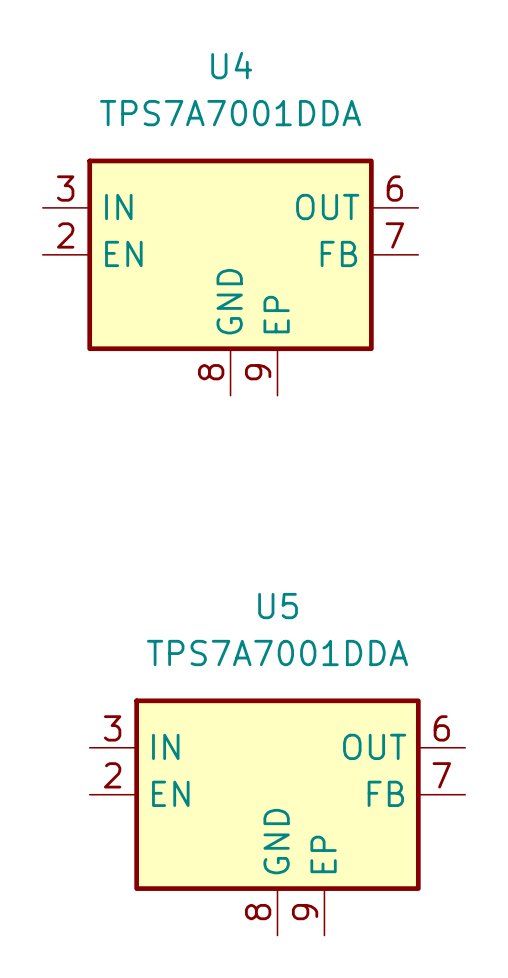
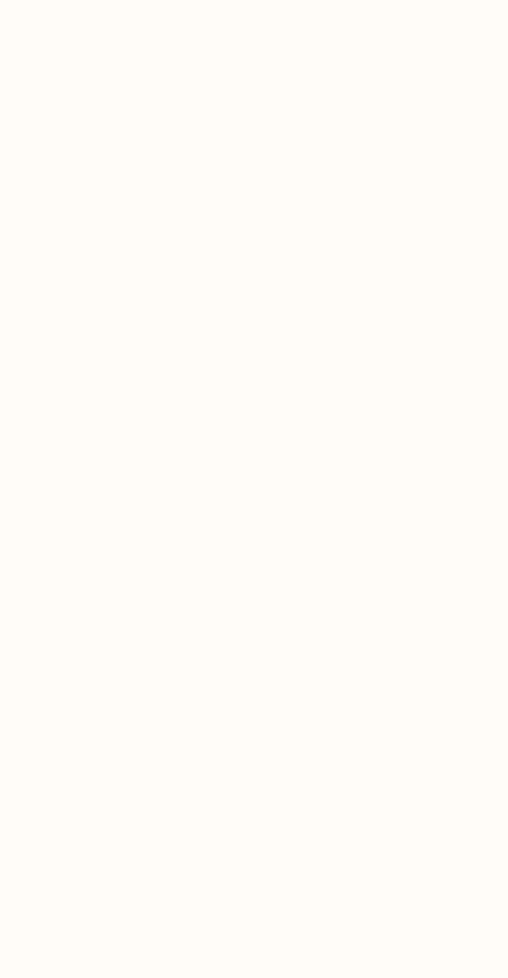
U4: TPS7A7001DDA (230, 277) -> none
U5: TPS7A7001DDA (277, 817) -> none

